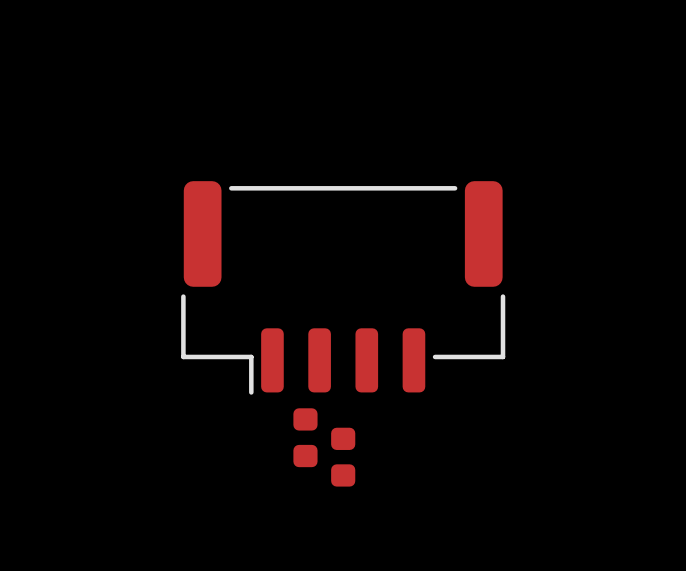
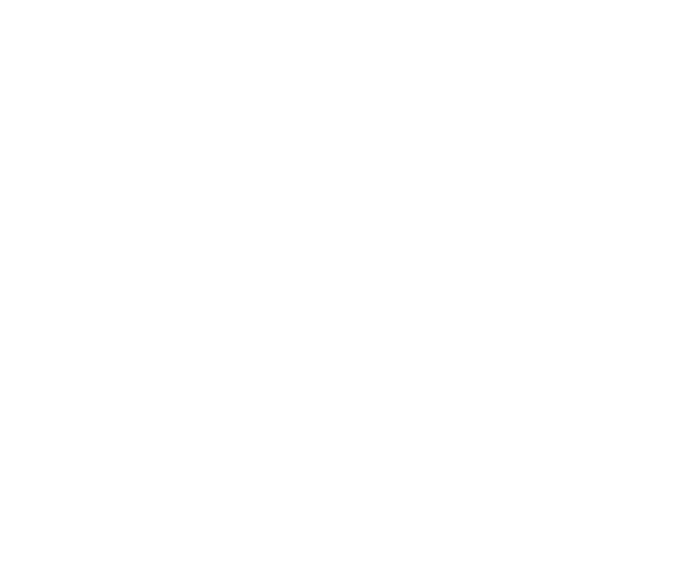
part: (343, 287) -> none
part: (305, 437) -> none
part: (343, 457) -> none

